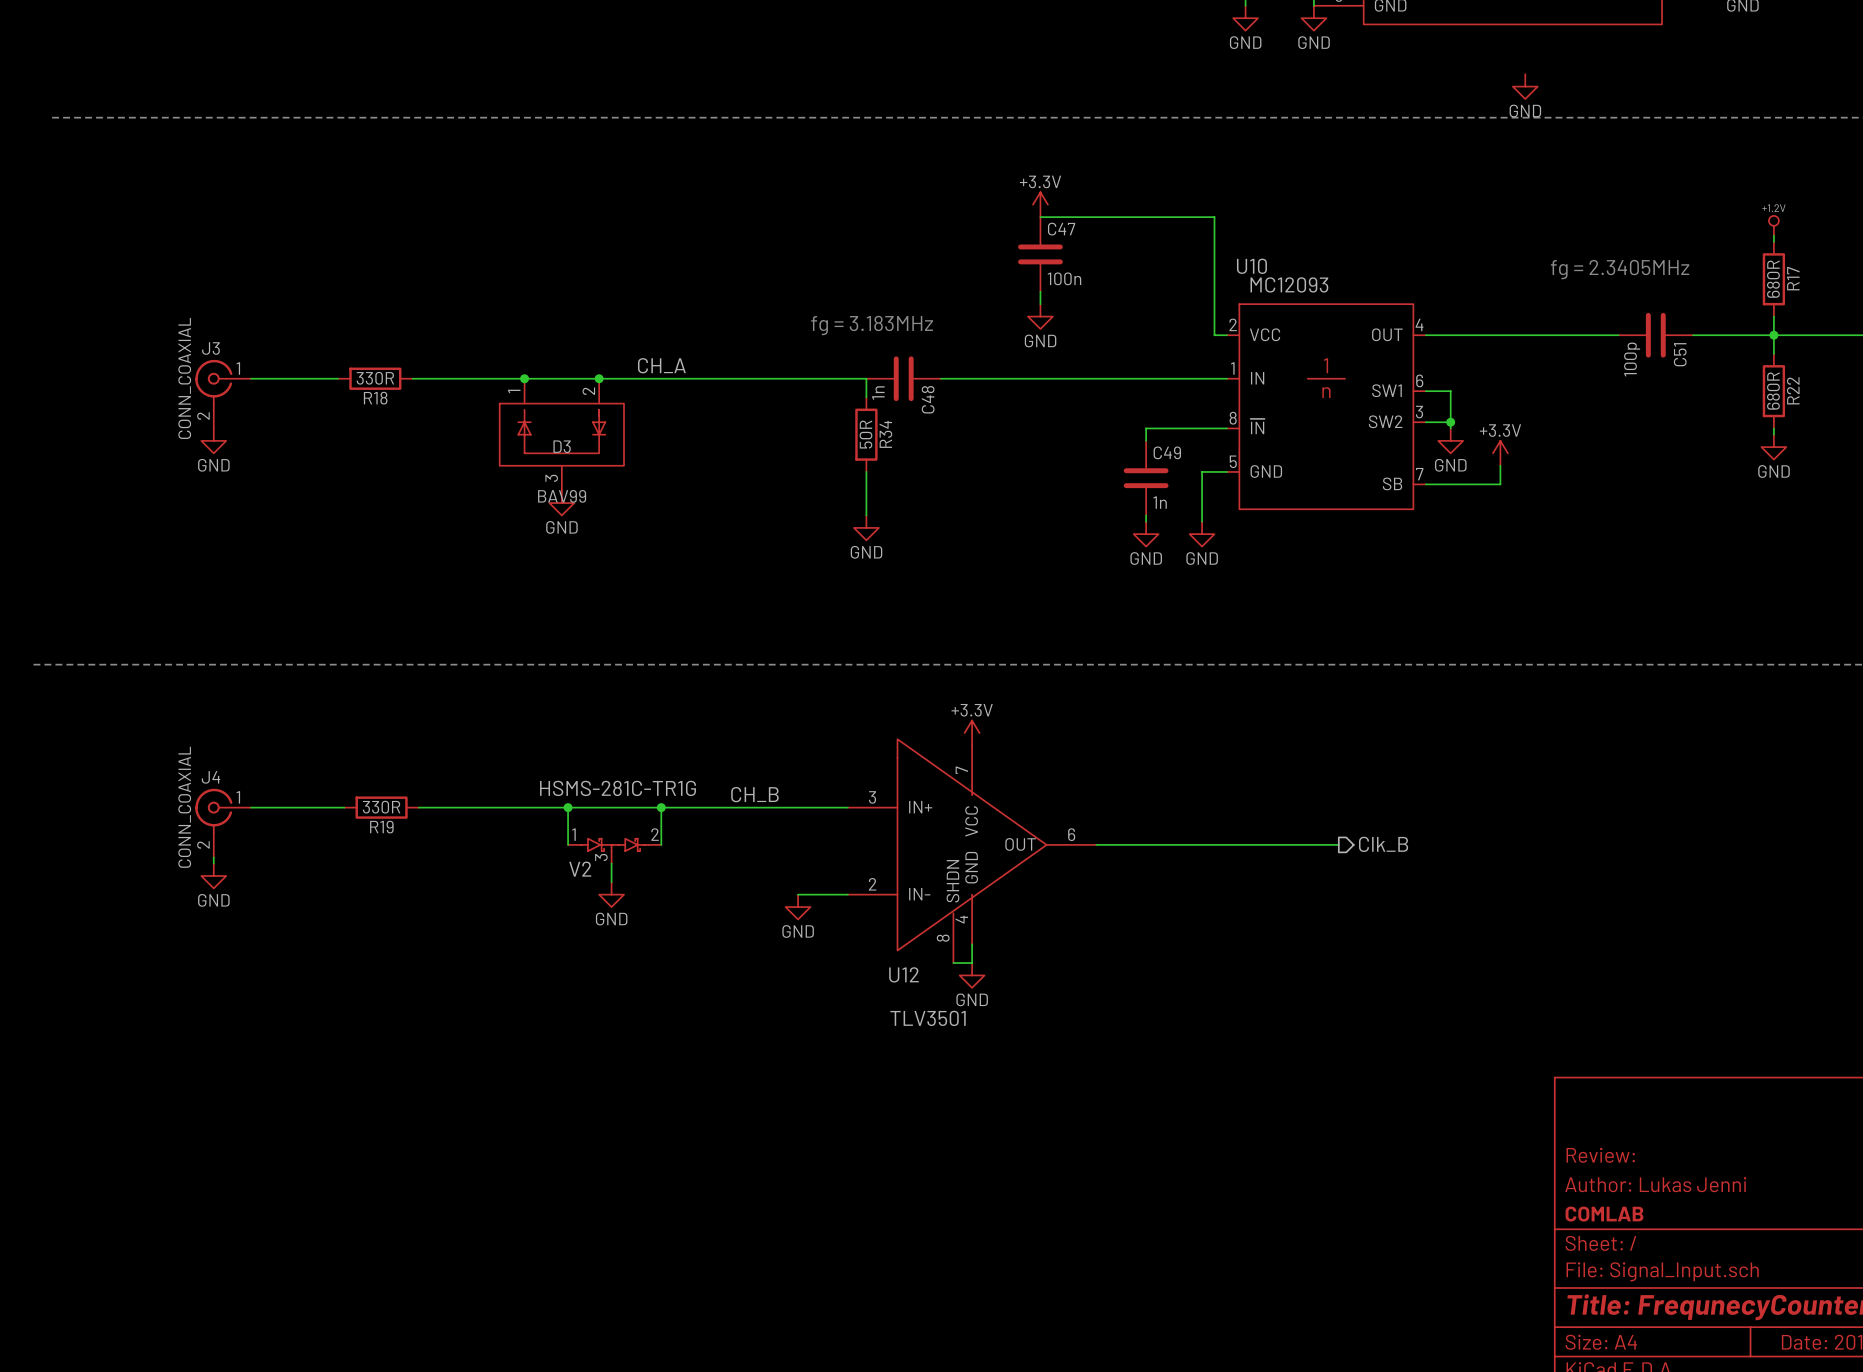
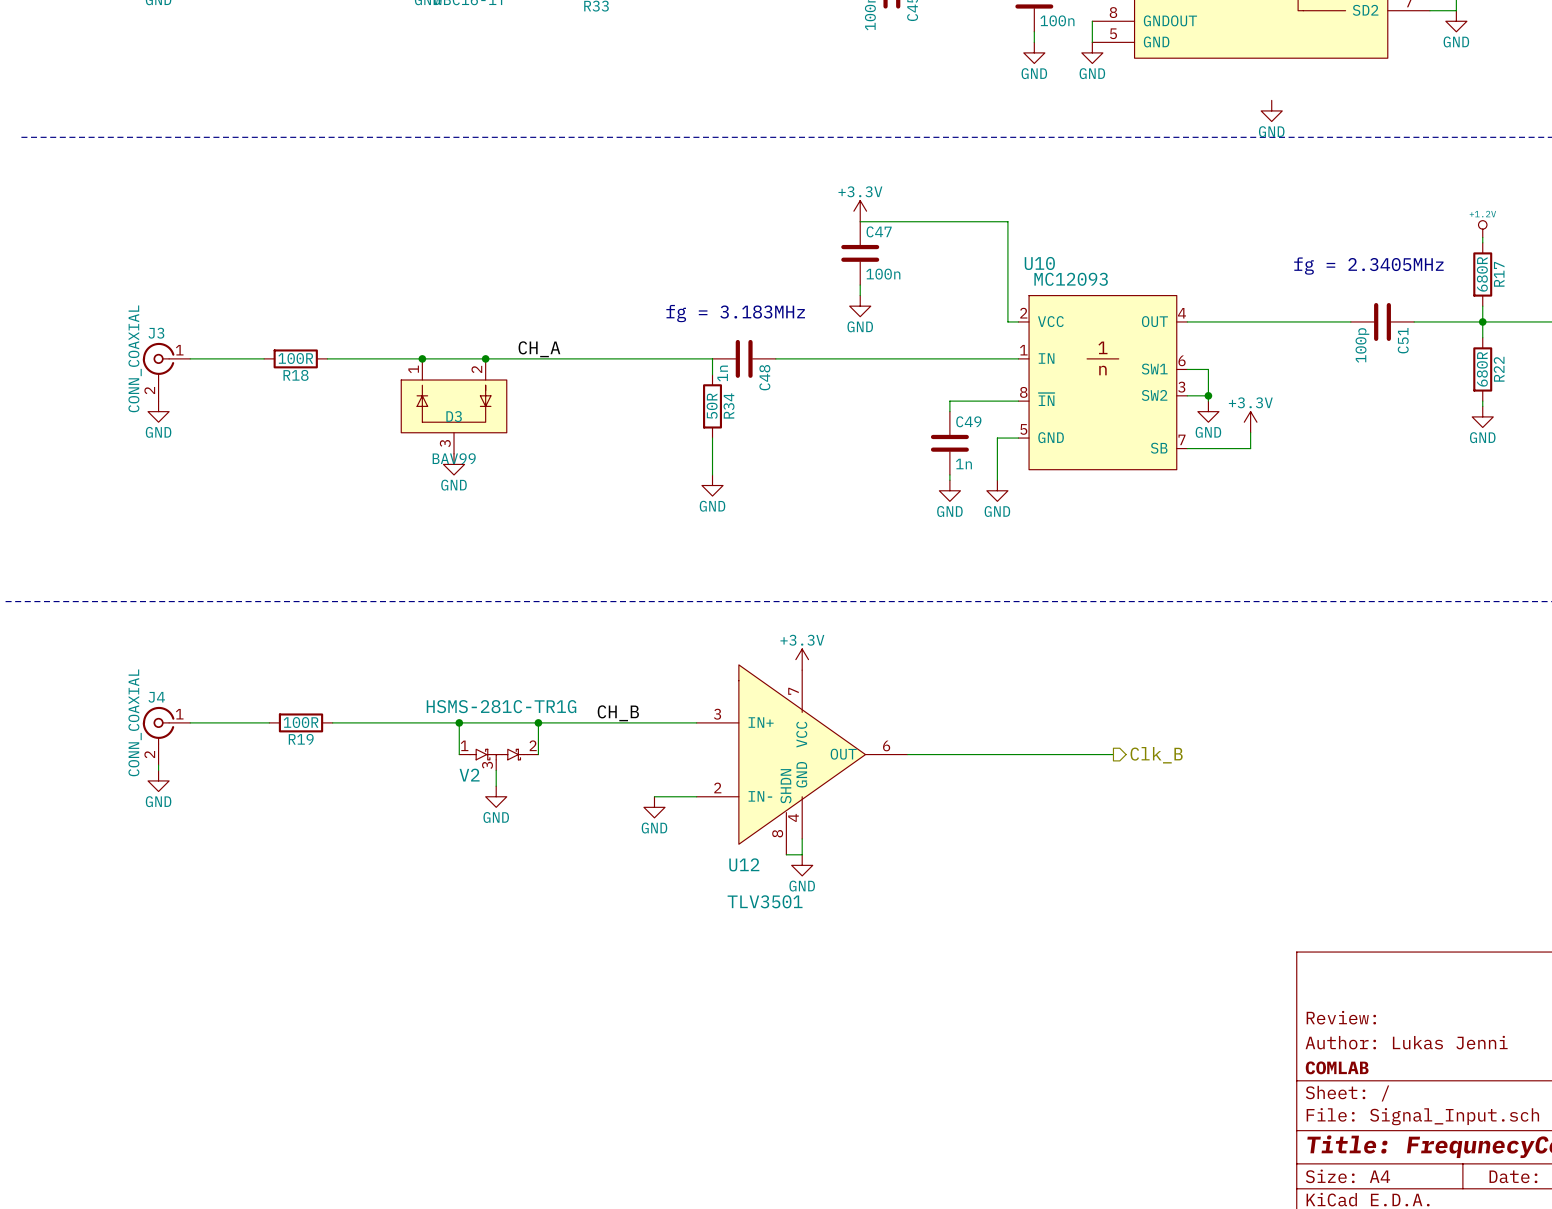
R18 value: 330R (375, 378) -> 100R (295, 358)
R19 value: 330R (381, 807) -> 100R (301, 722)

